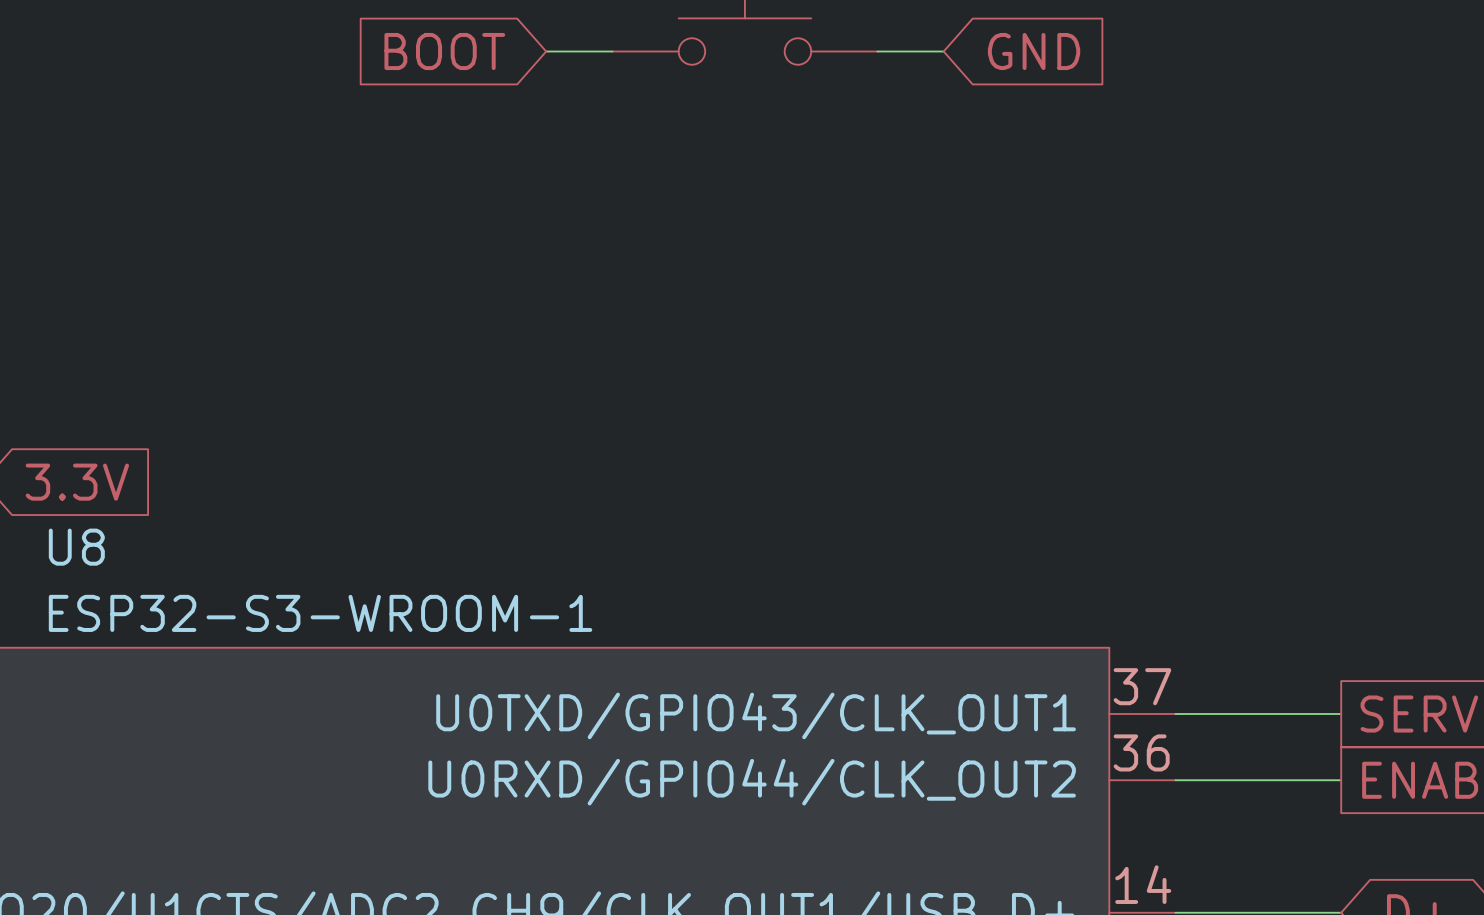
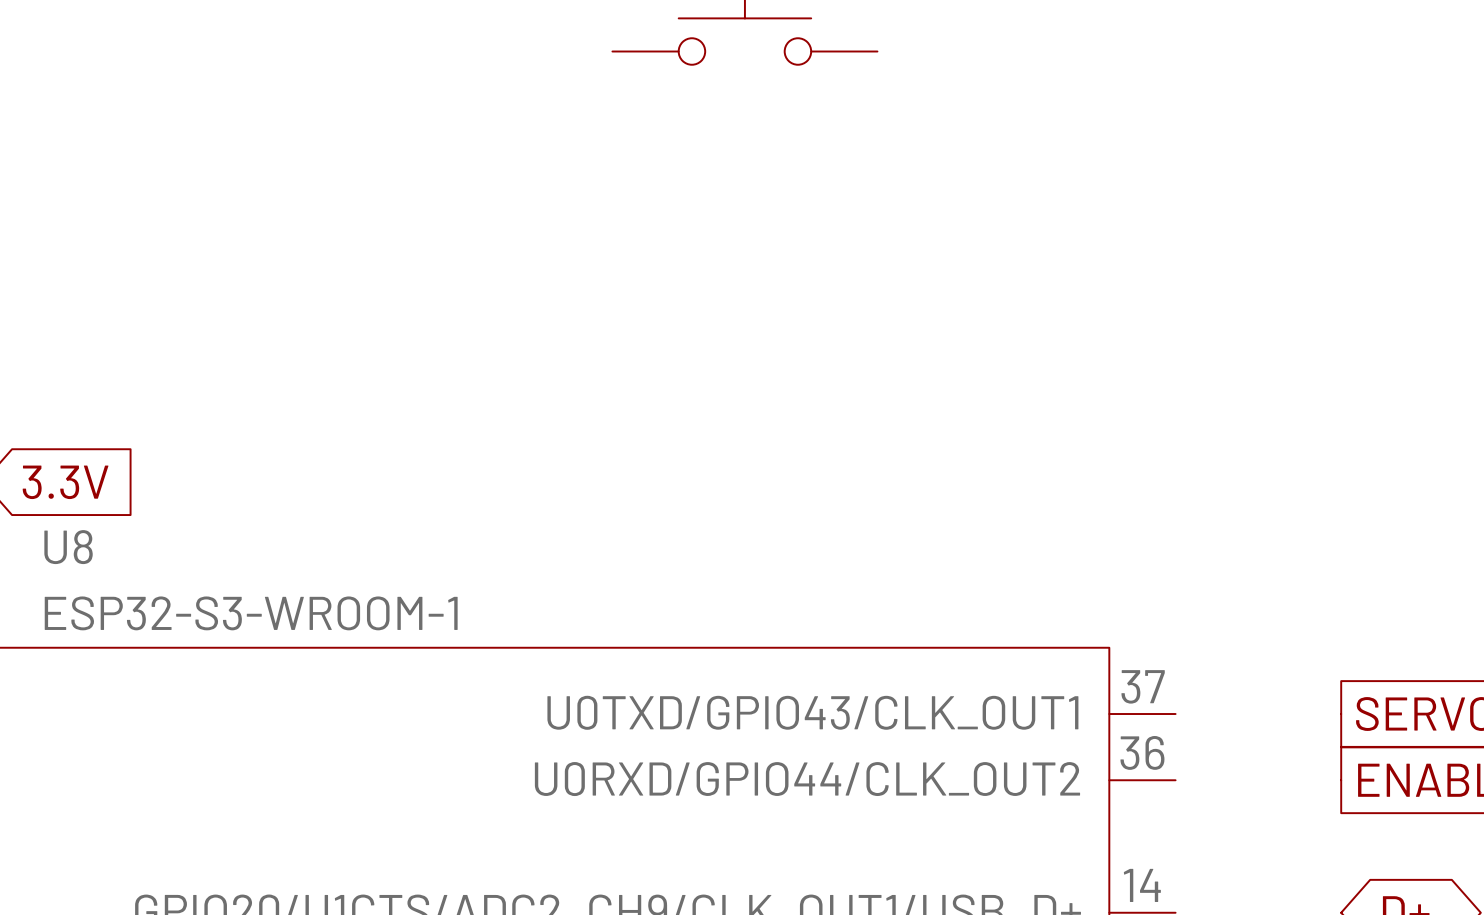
global label: BOOT (444, 51) -> none
wire: (546, 51) (612, 51) -> none
wire: (877, 51) (943, 51) -> none
global label: GND (1034, 51) -> none
wire: (1175, 714) (1341, 714) -> none
wire: (1175, 780) (1341, 780) -> none
wire: (1175, 912) (1341, 912) -> none

